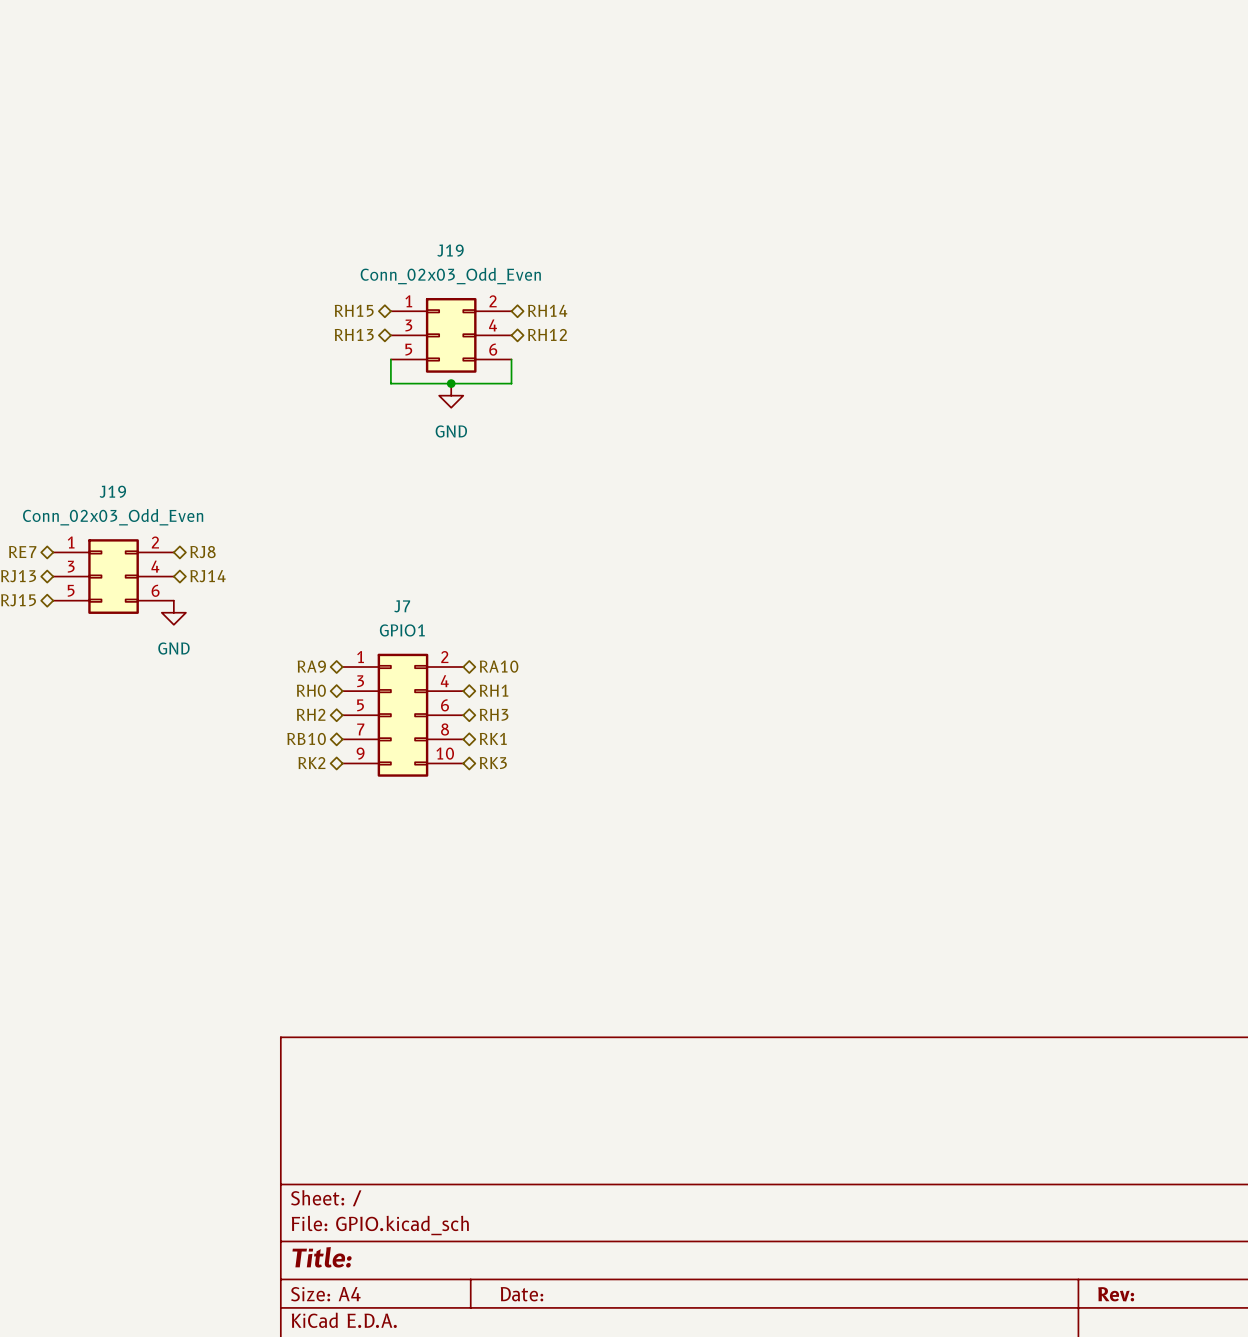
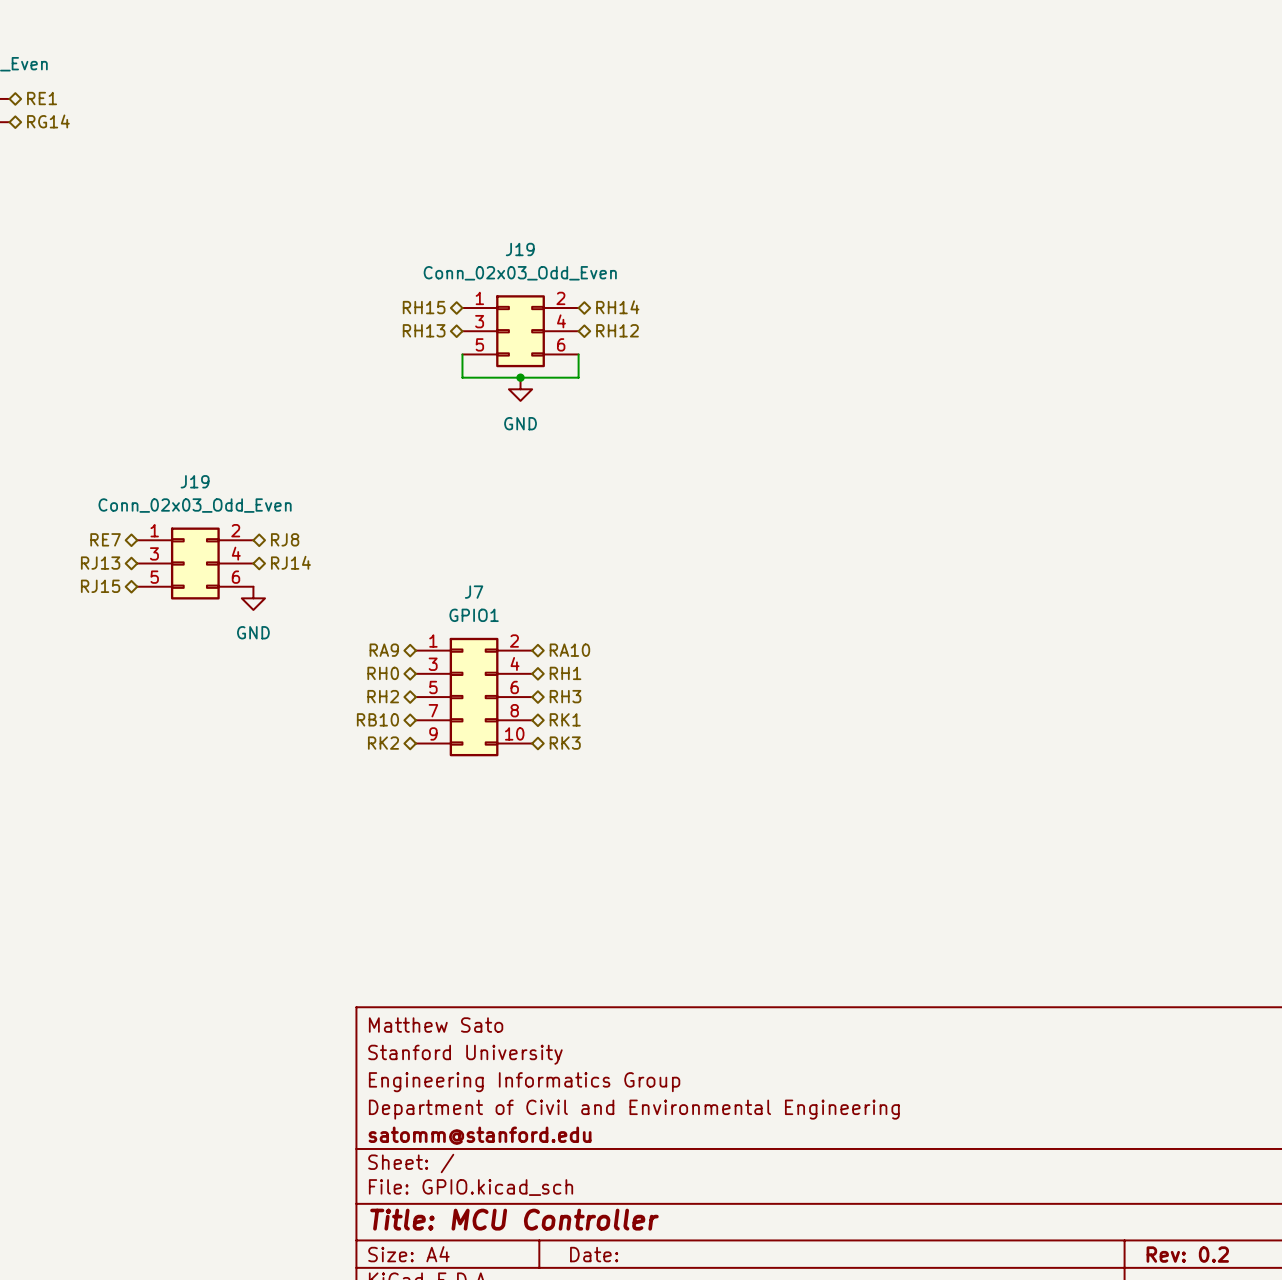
title block: none -> Matthew Sato (436, 1025)
title block: none -> Stanford University (465, 1054)
title block: none -> Engineering Informatics Group (524, 1082)
title block: none -> Department of Civil and Environmental Engineering (634, 1109)
title block: none -> satomm@stanford.edu (480, 1135)
title block: Title: (322, 1257) -> Title: MCU Controller (514, 1219)
title block: Rev: (1116, 1294) -> Rev: 0.2 (1187, 1254)

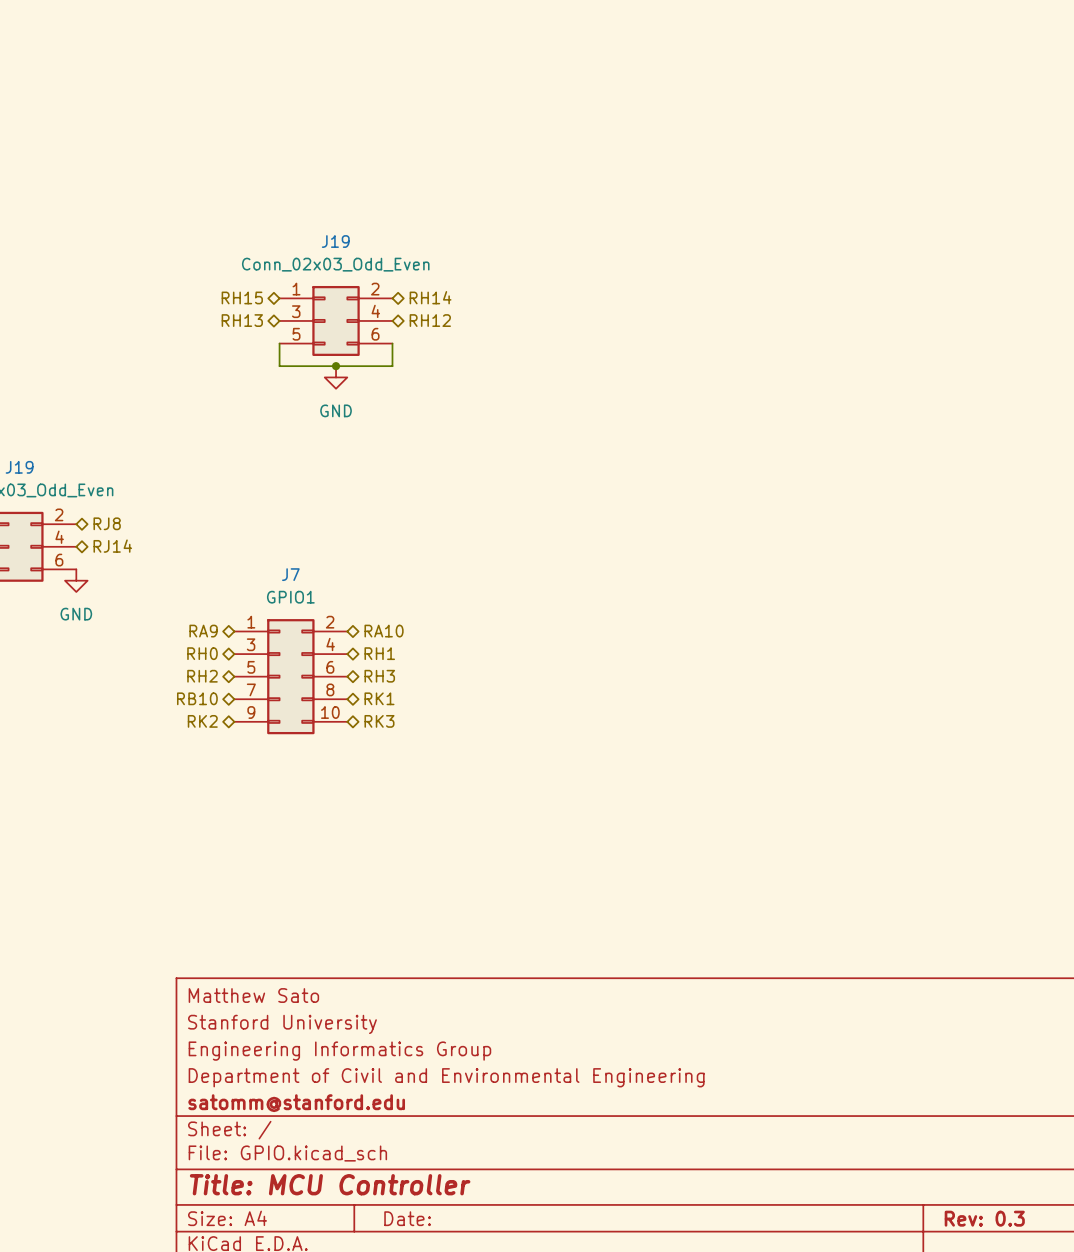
title block: Rev: 0.2 (1187, 1254) -> Rev: 0.3 (984, 1218)

